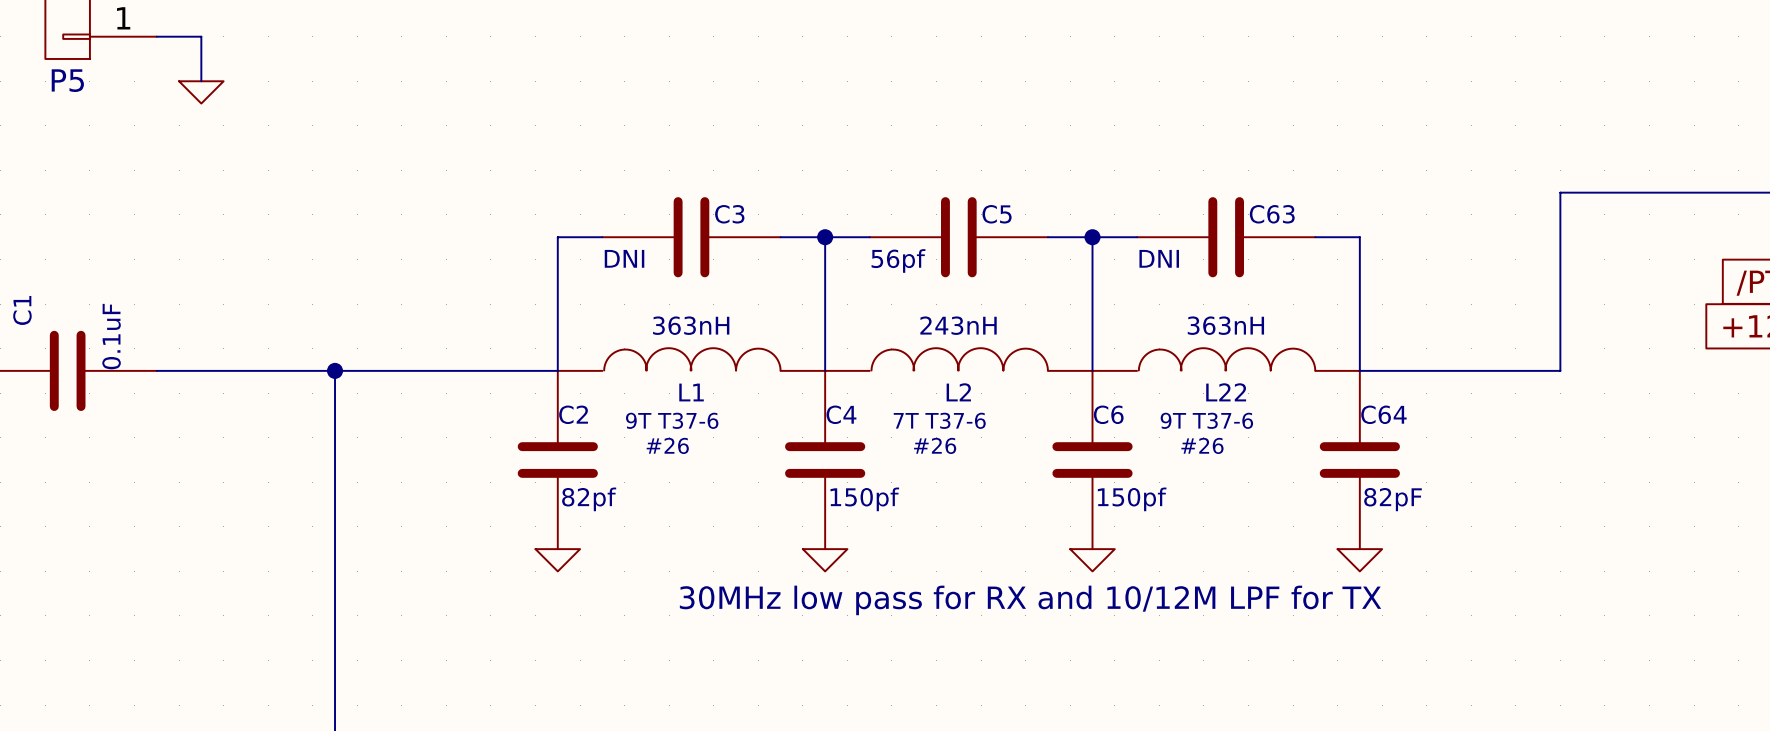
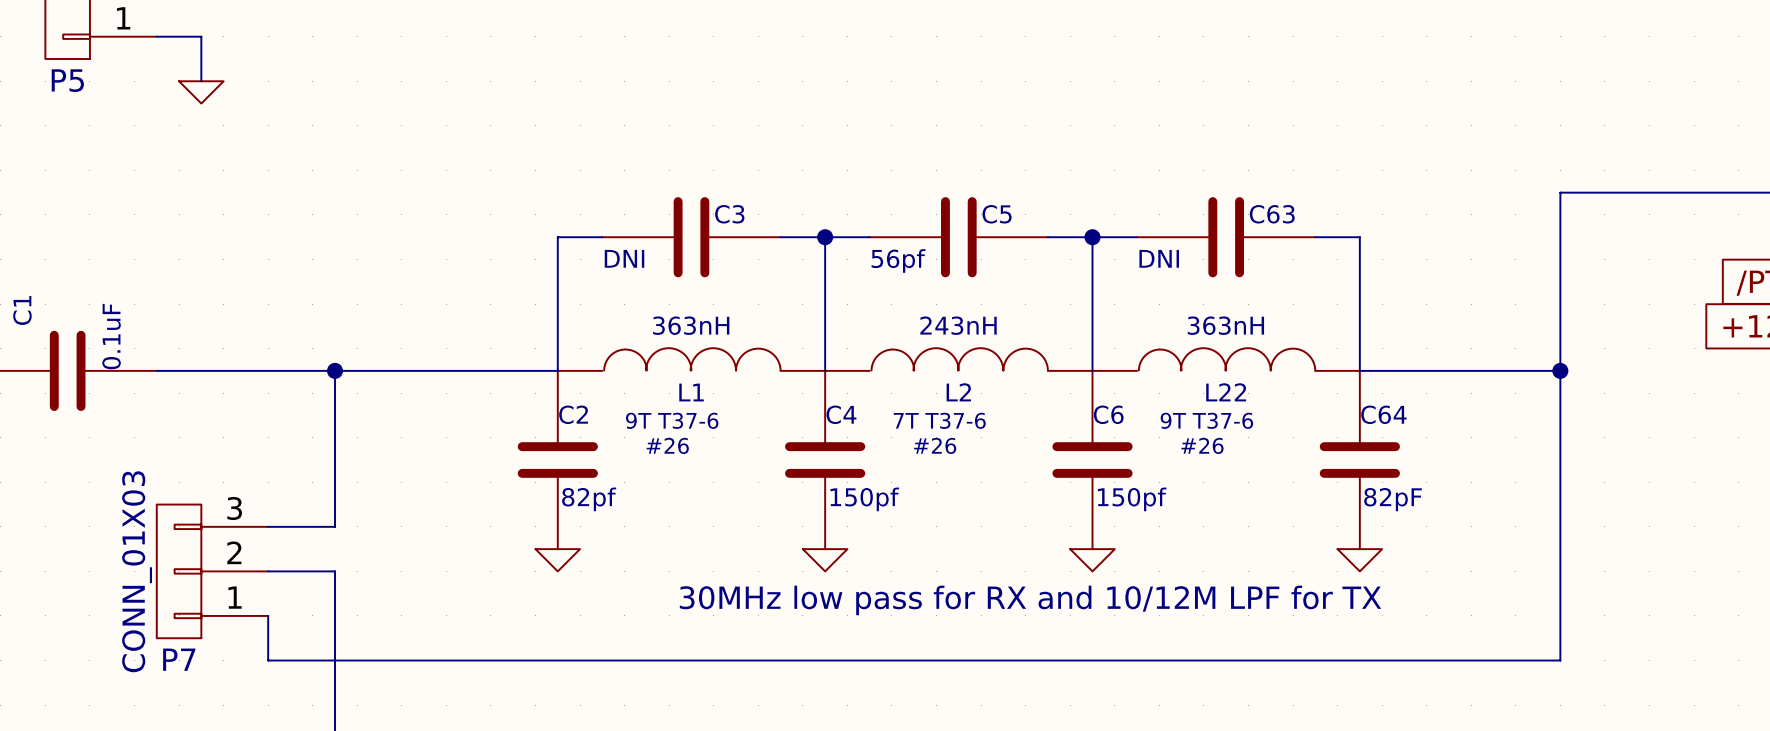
wire: none -> (1560, 370) (1560, 660) (268, 660) (268, 615)
junction: none -> (1560, 370)
wire: (335, 526) (335, 571) -> (335, 526) (268, 526)
P7: none -> CONN_01X03 (212, 571)
wire: none -> (268, 571) (335, 571)

